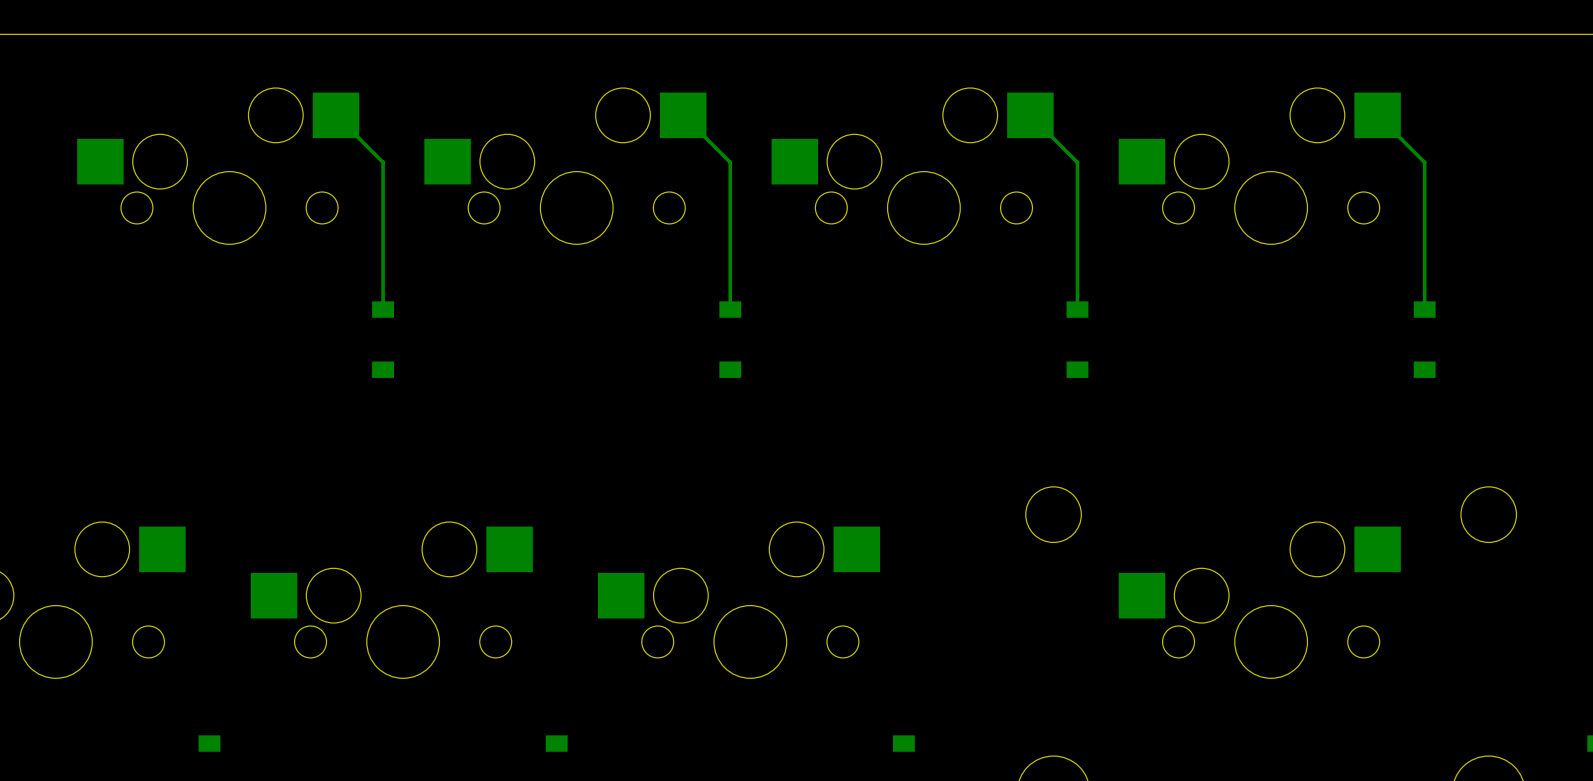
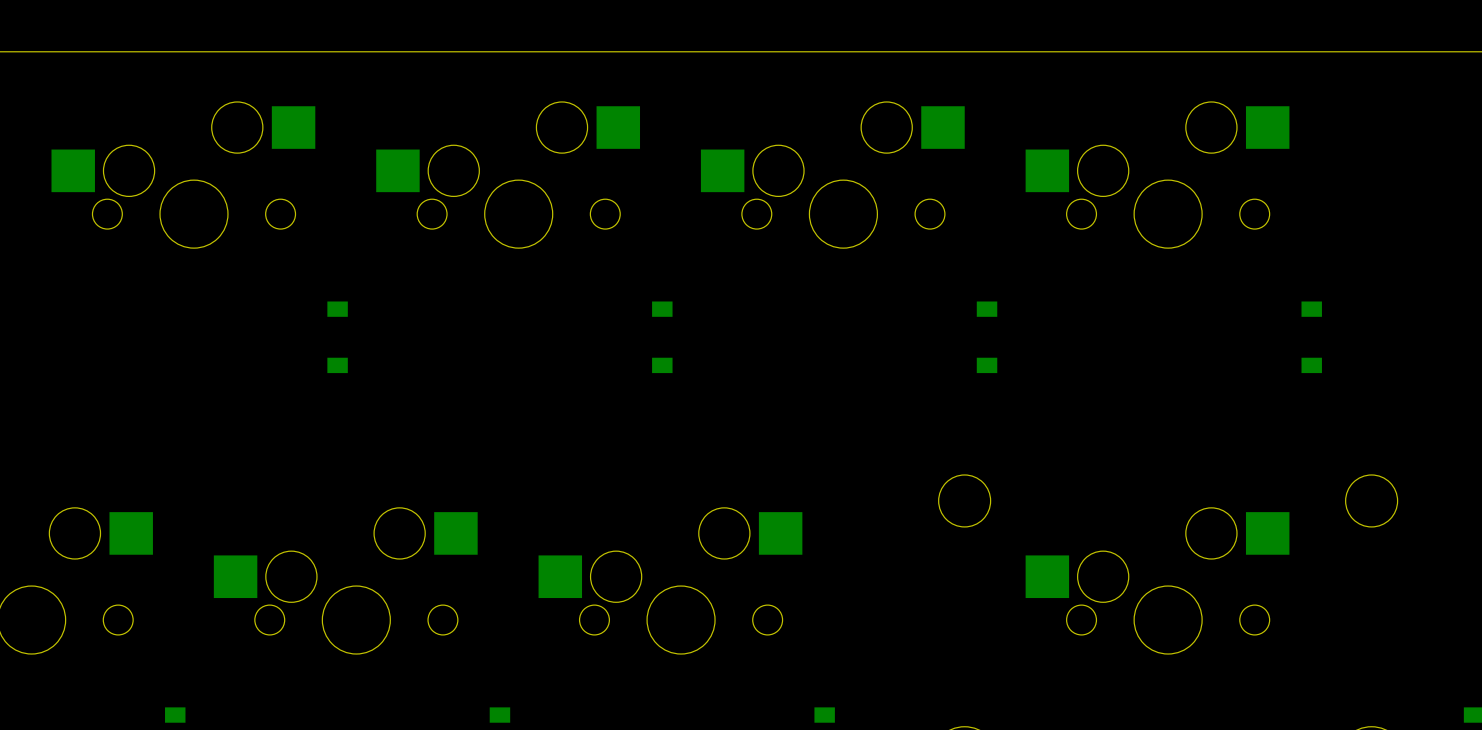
bottom track: (336, 115) (383, 162) (383, 309) -> none
bottom track: (683, 115) (730, 162) (730, 309) -> none
bottom track: (1030, 115) (1077, 162) (1077, 309) -> none
bottom track: (1377, 115) (1424, 162) (1424, 309) -> none

